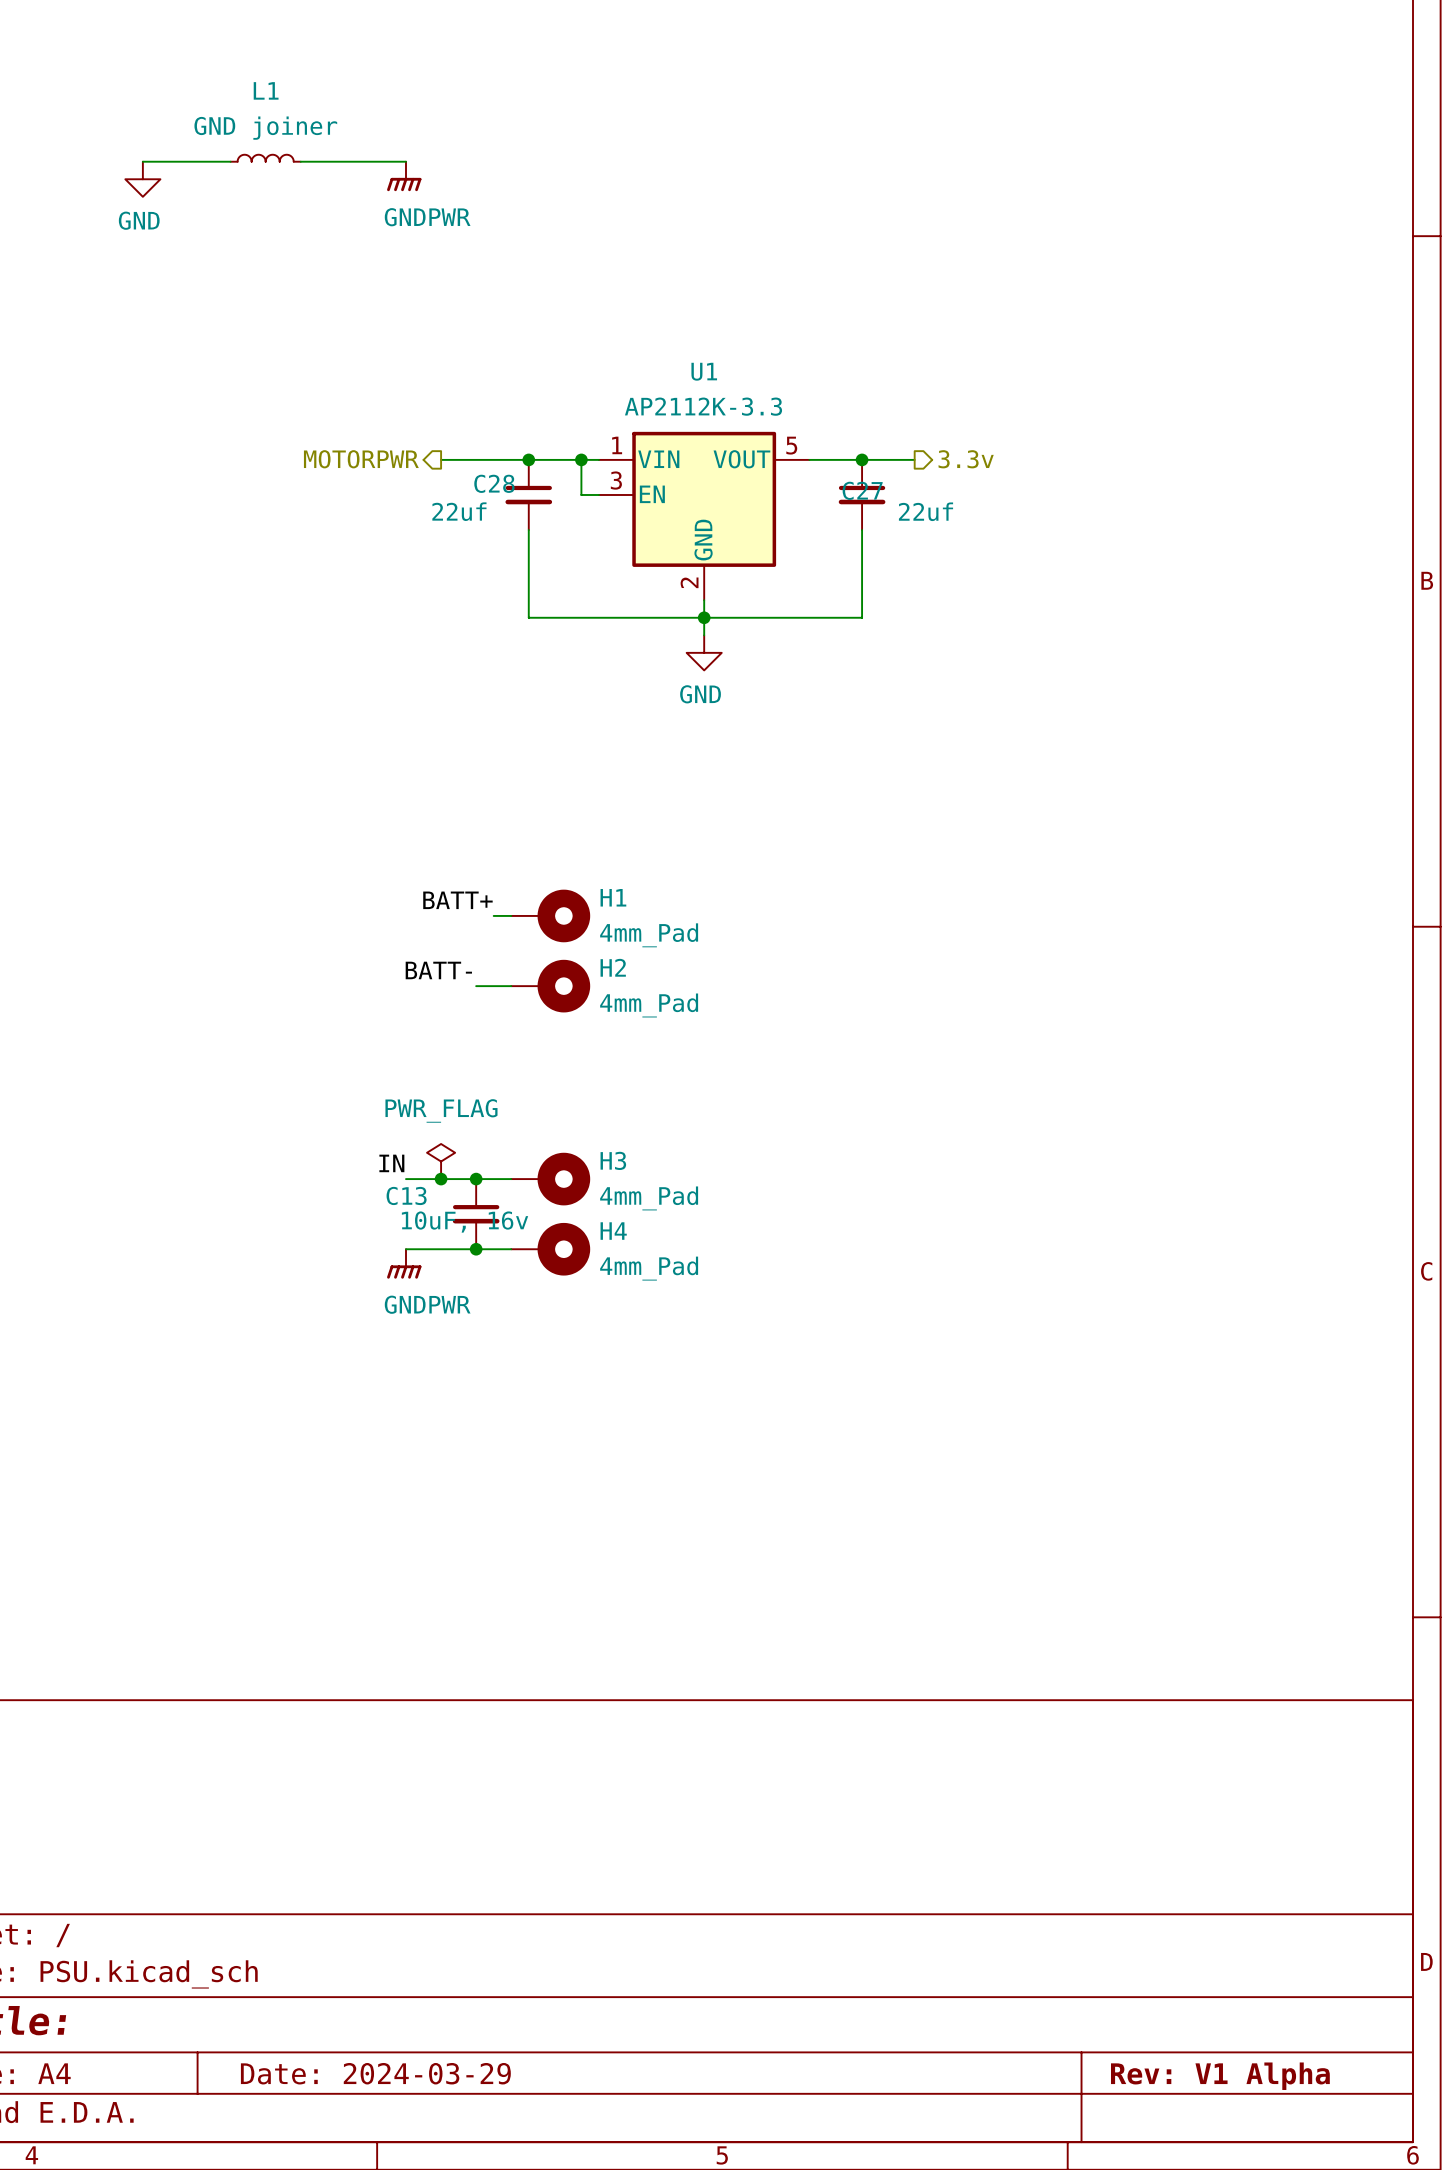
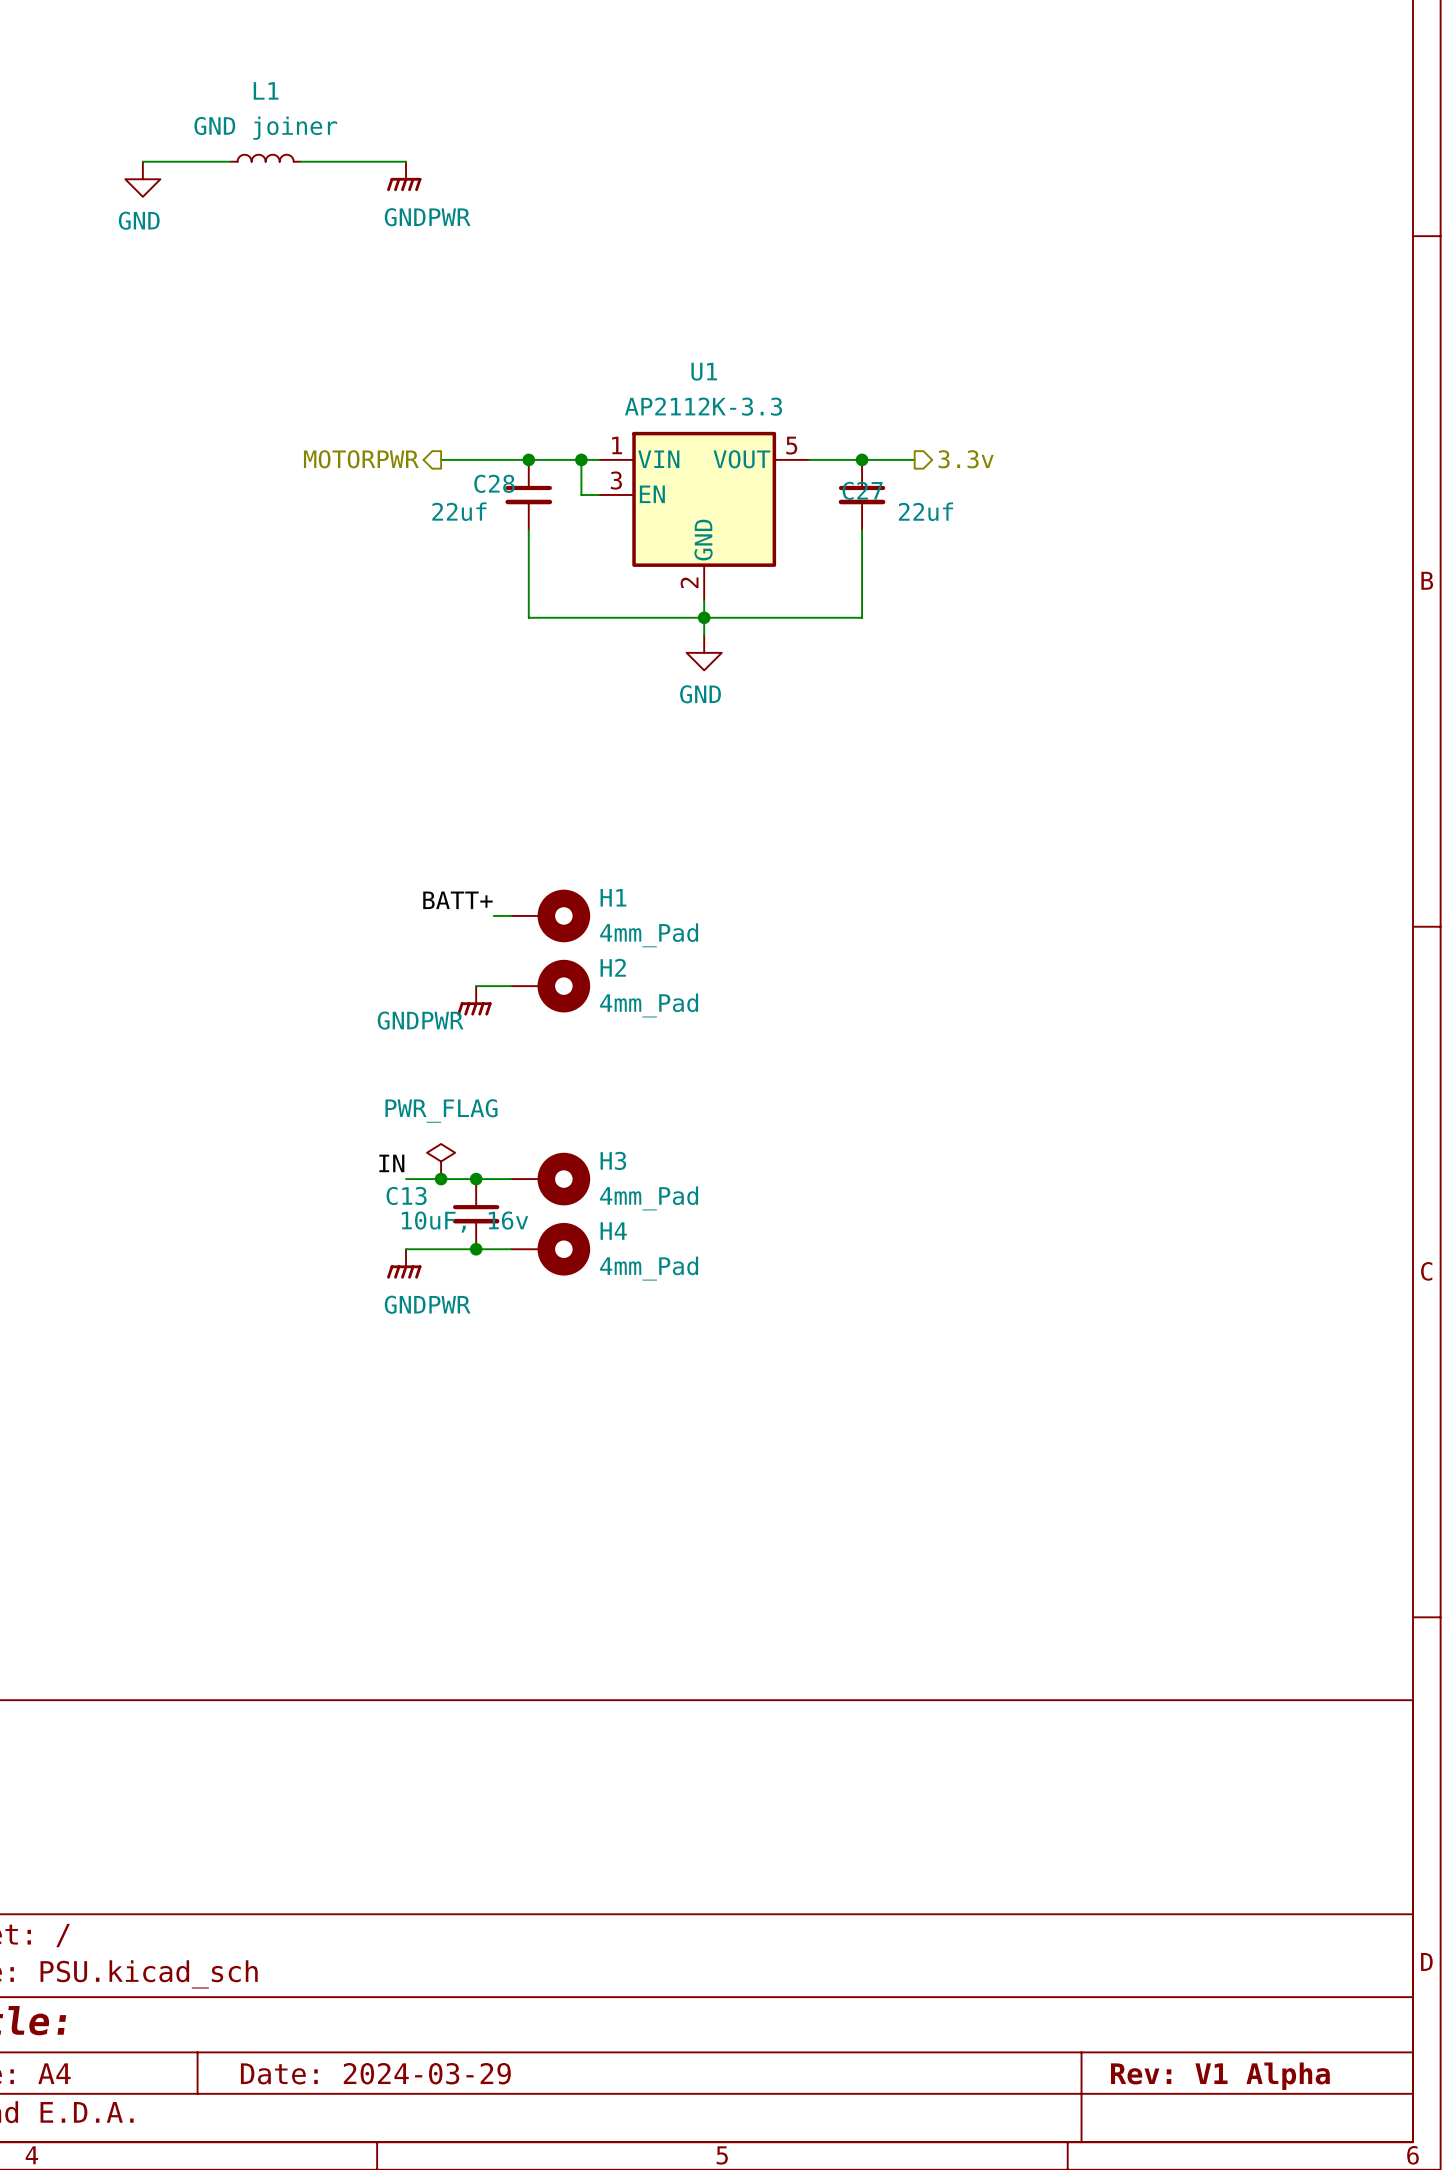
label: BATT- (438, 970) -> none
power symbol: none -> GNDPWR (474, 1000)

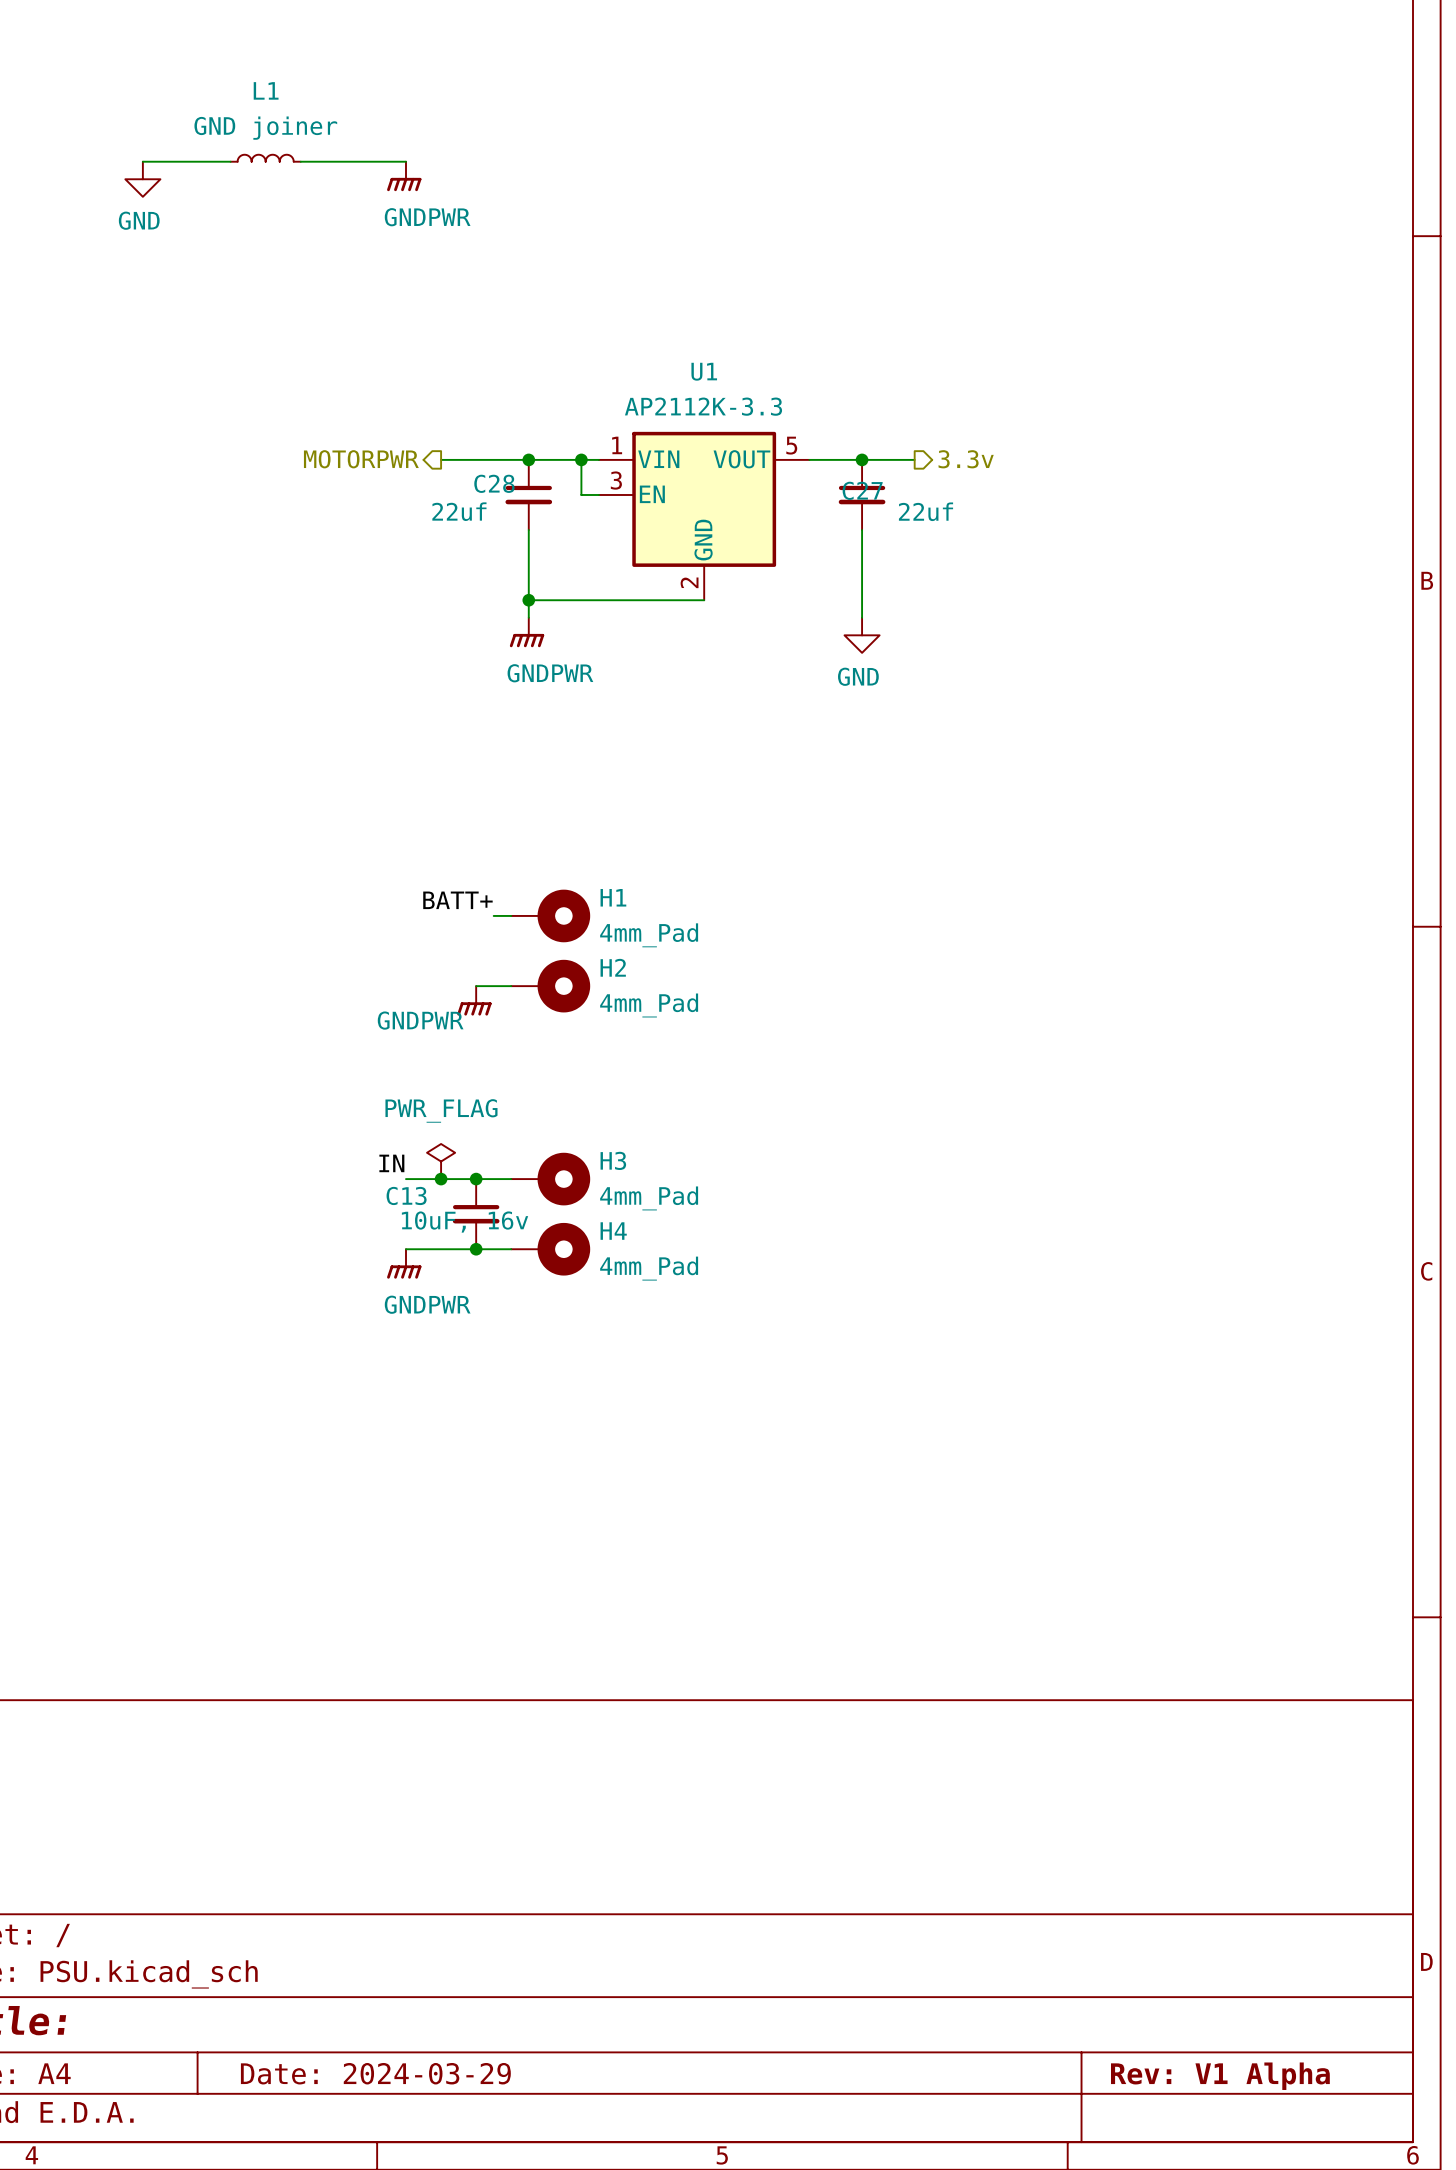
junction: none -> (528, 600)
wire: (704, 600) (704, 635) -> (704, 600) (528, 600)
wire: (528, 617) (862, 617) -> none
junction: (704, 617) -> none
power symbol: none -> GNDPWR (527, 632)
power symbol position: GND (704, 652) -> GND (862, 635)

